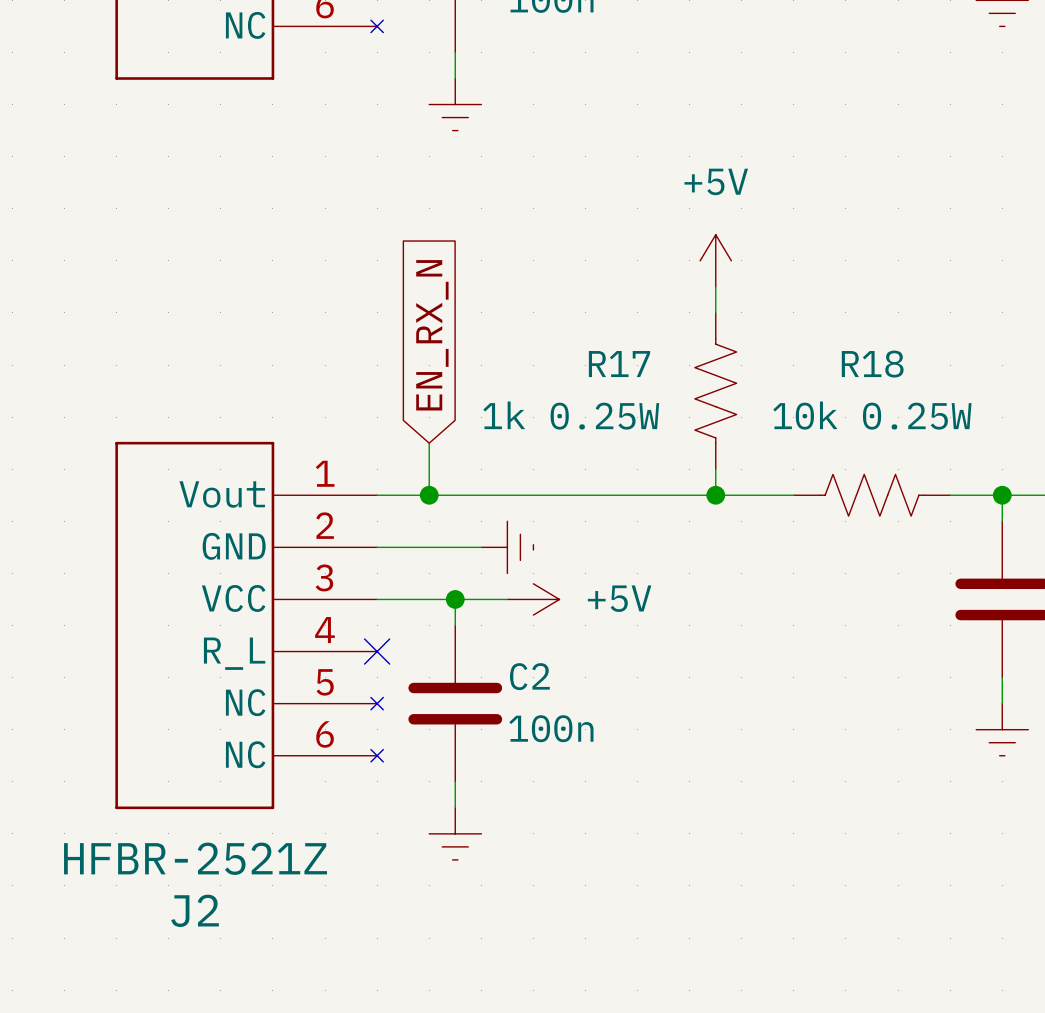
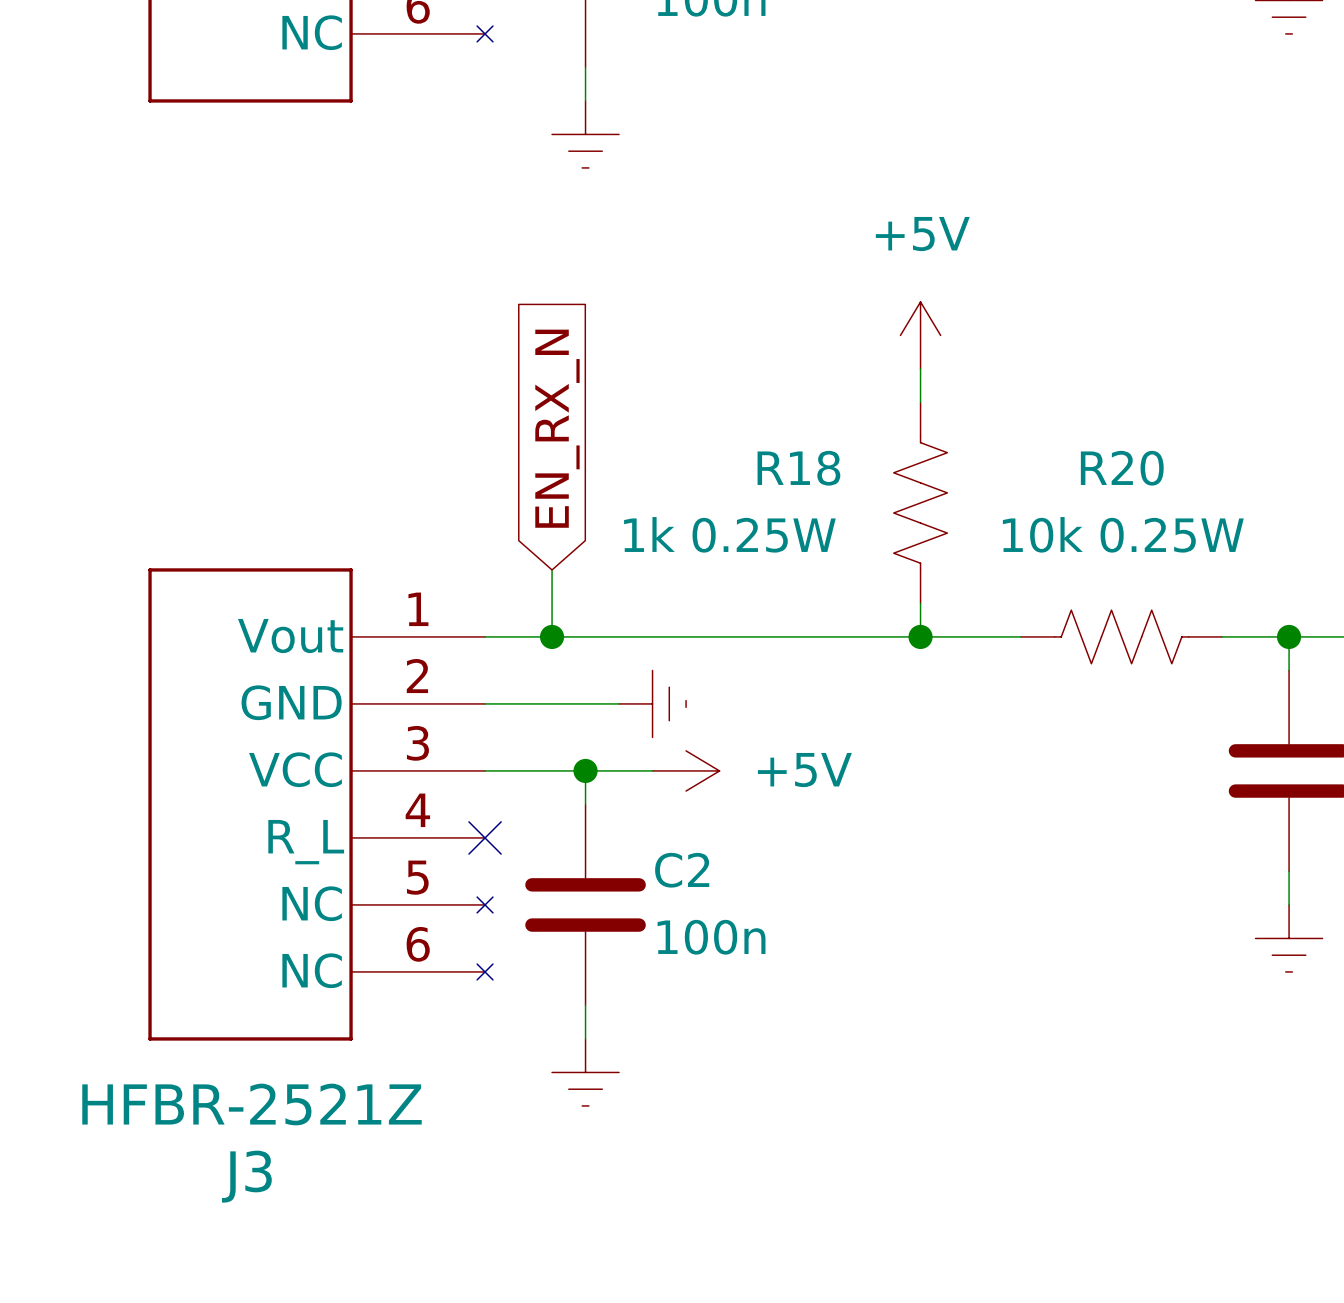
R17 name: R17 (619, 364) -> R18 (798, 468)
R18 name: R18 (872, 364) -> R20 (1122, 468)
J2 name: J2 (195, 910) -> J3 (246, 1176)

